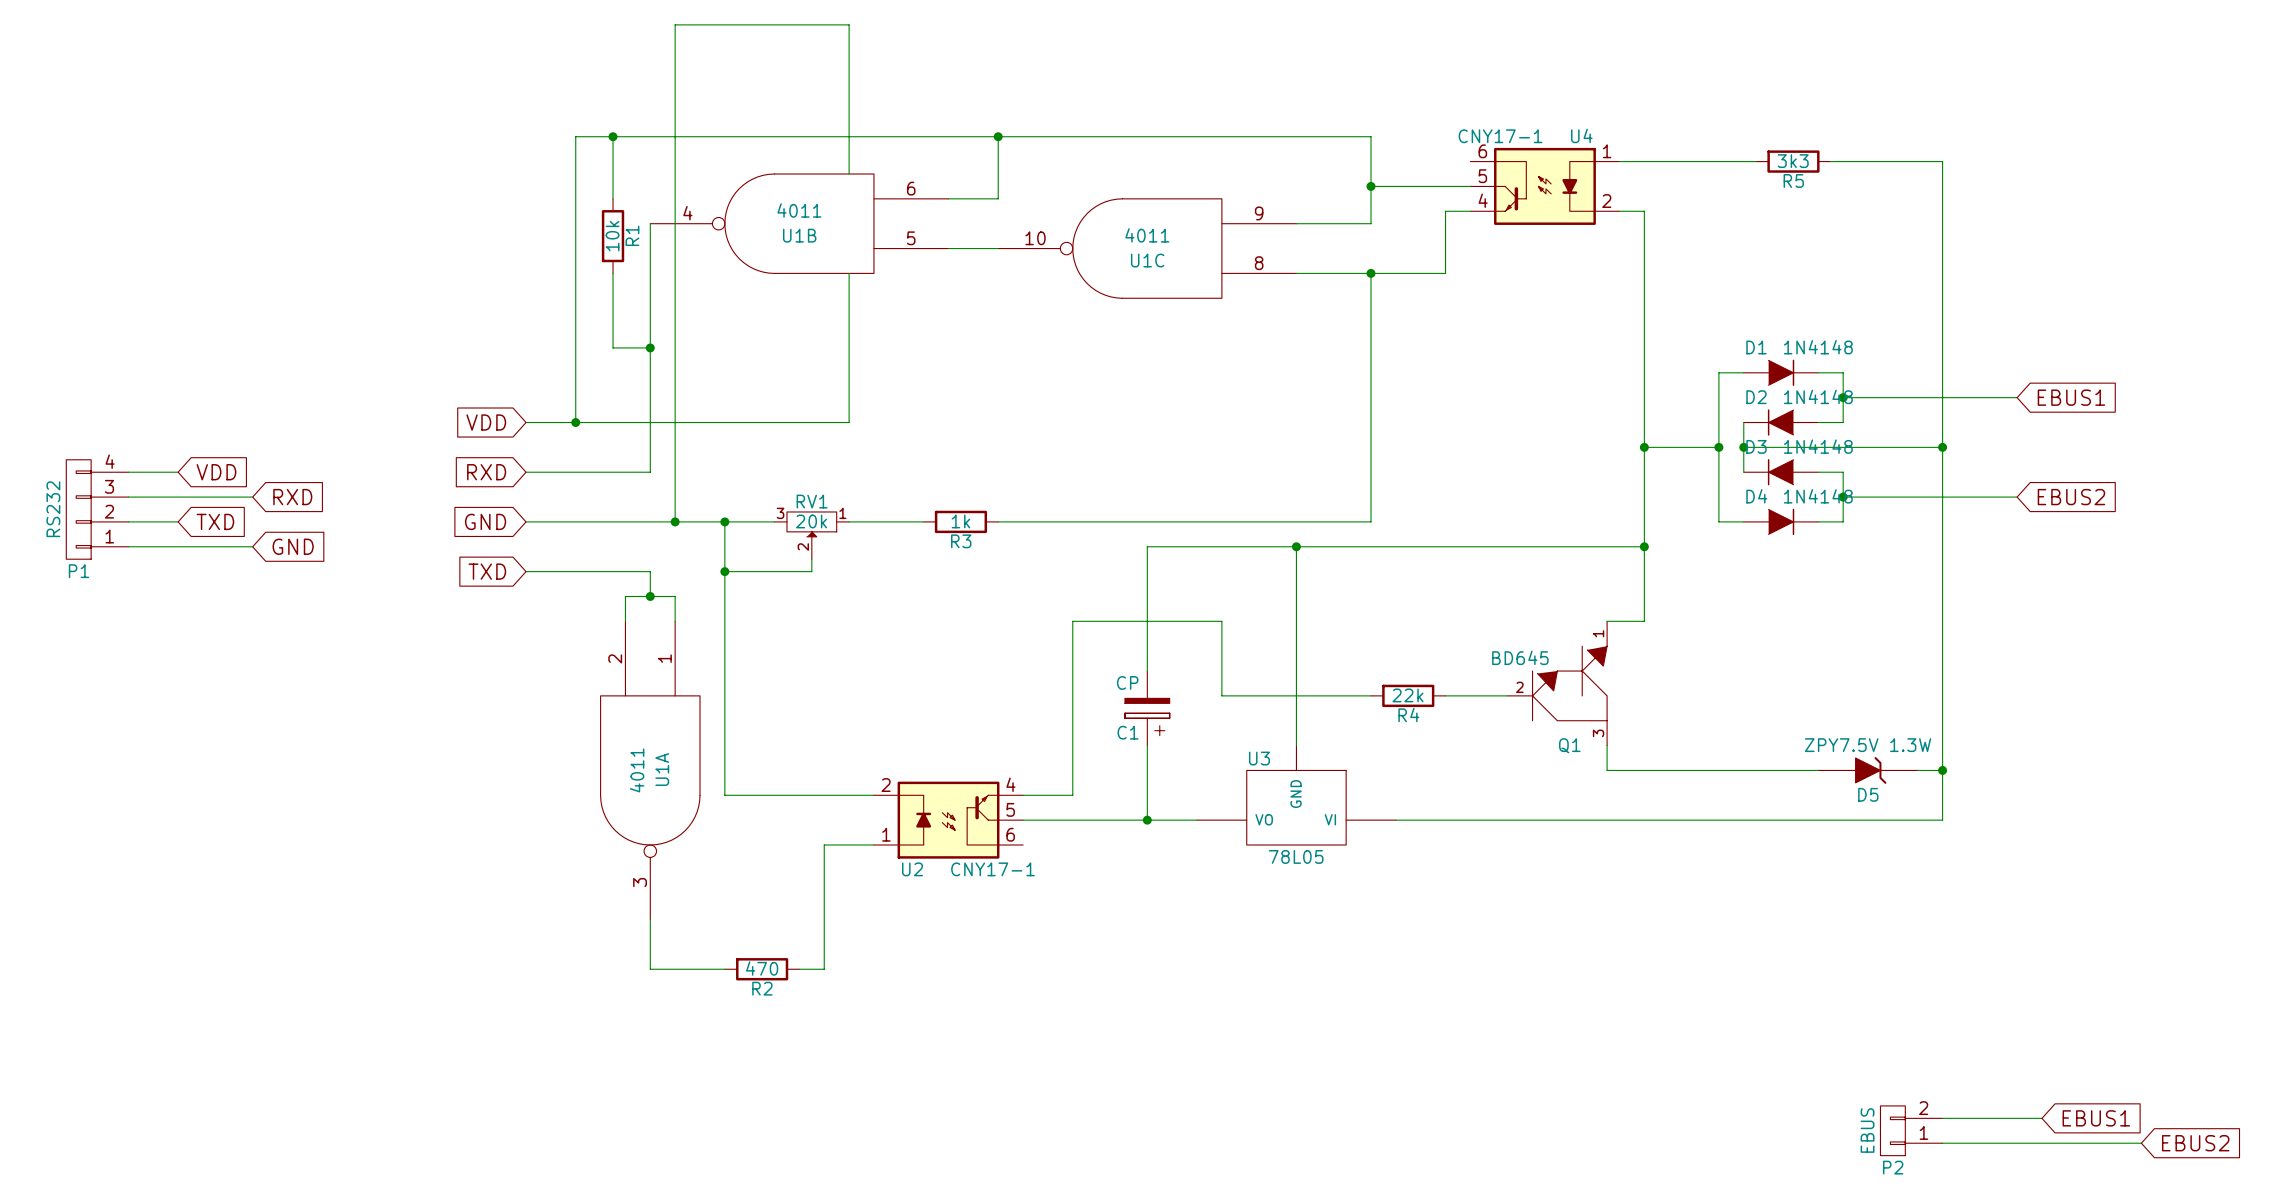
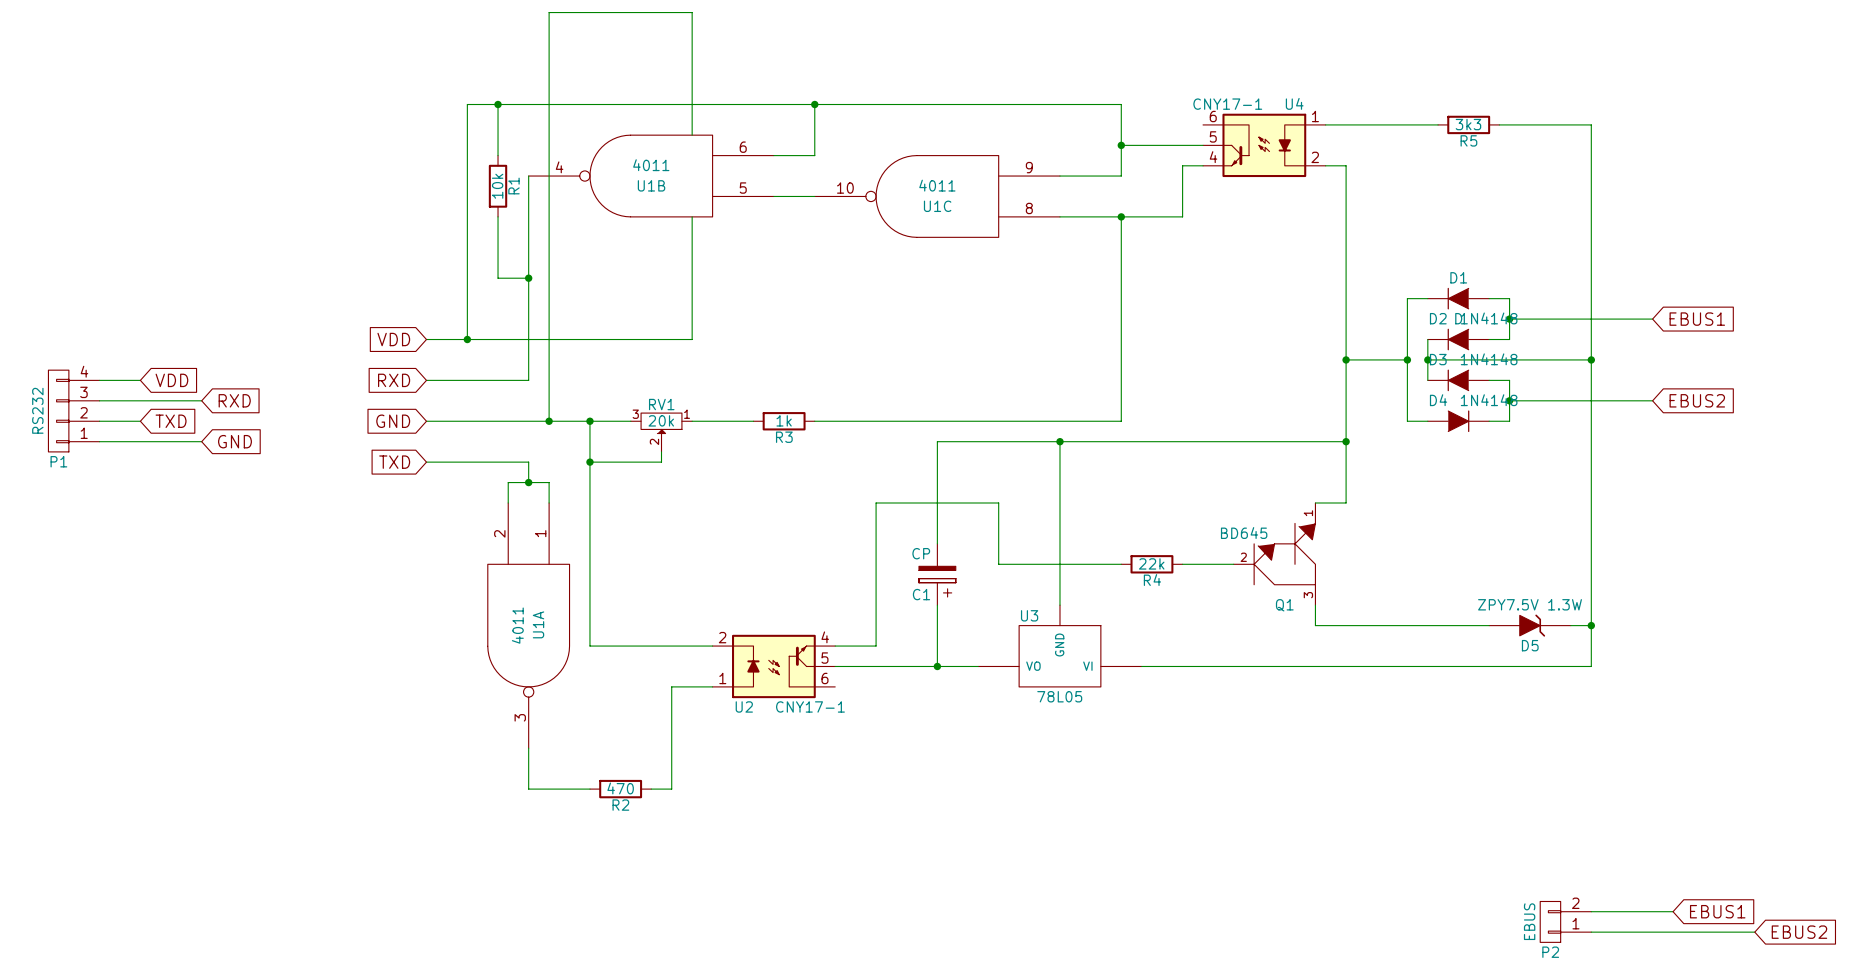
D1 name position: D1 (1756, 347) -> D1 (1458, 277)
D1 value: 1N4148 (1818, 347) -> D (1458, 318)
D1 rotation: 0° (1781, 372) -> 180° (1458, 298)

